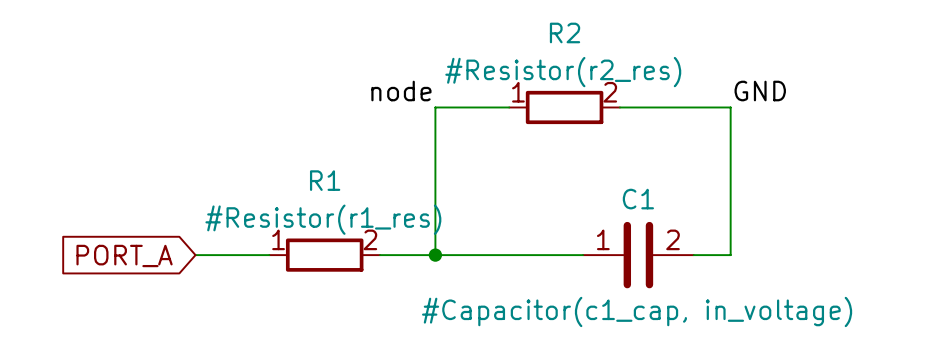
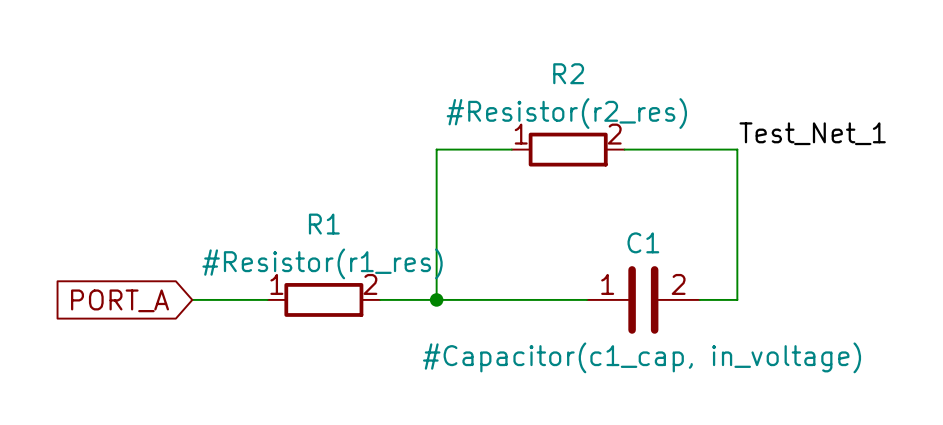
label: node (401, 91) -> none
label: GND (760, 91) -> Test_Net_1 (812, 133)

